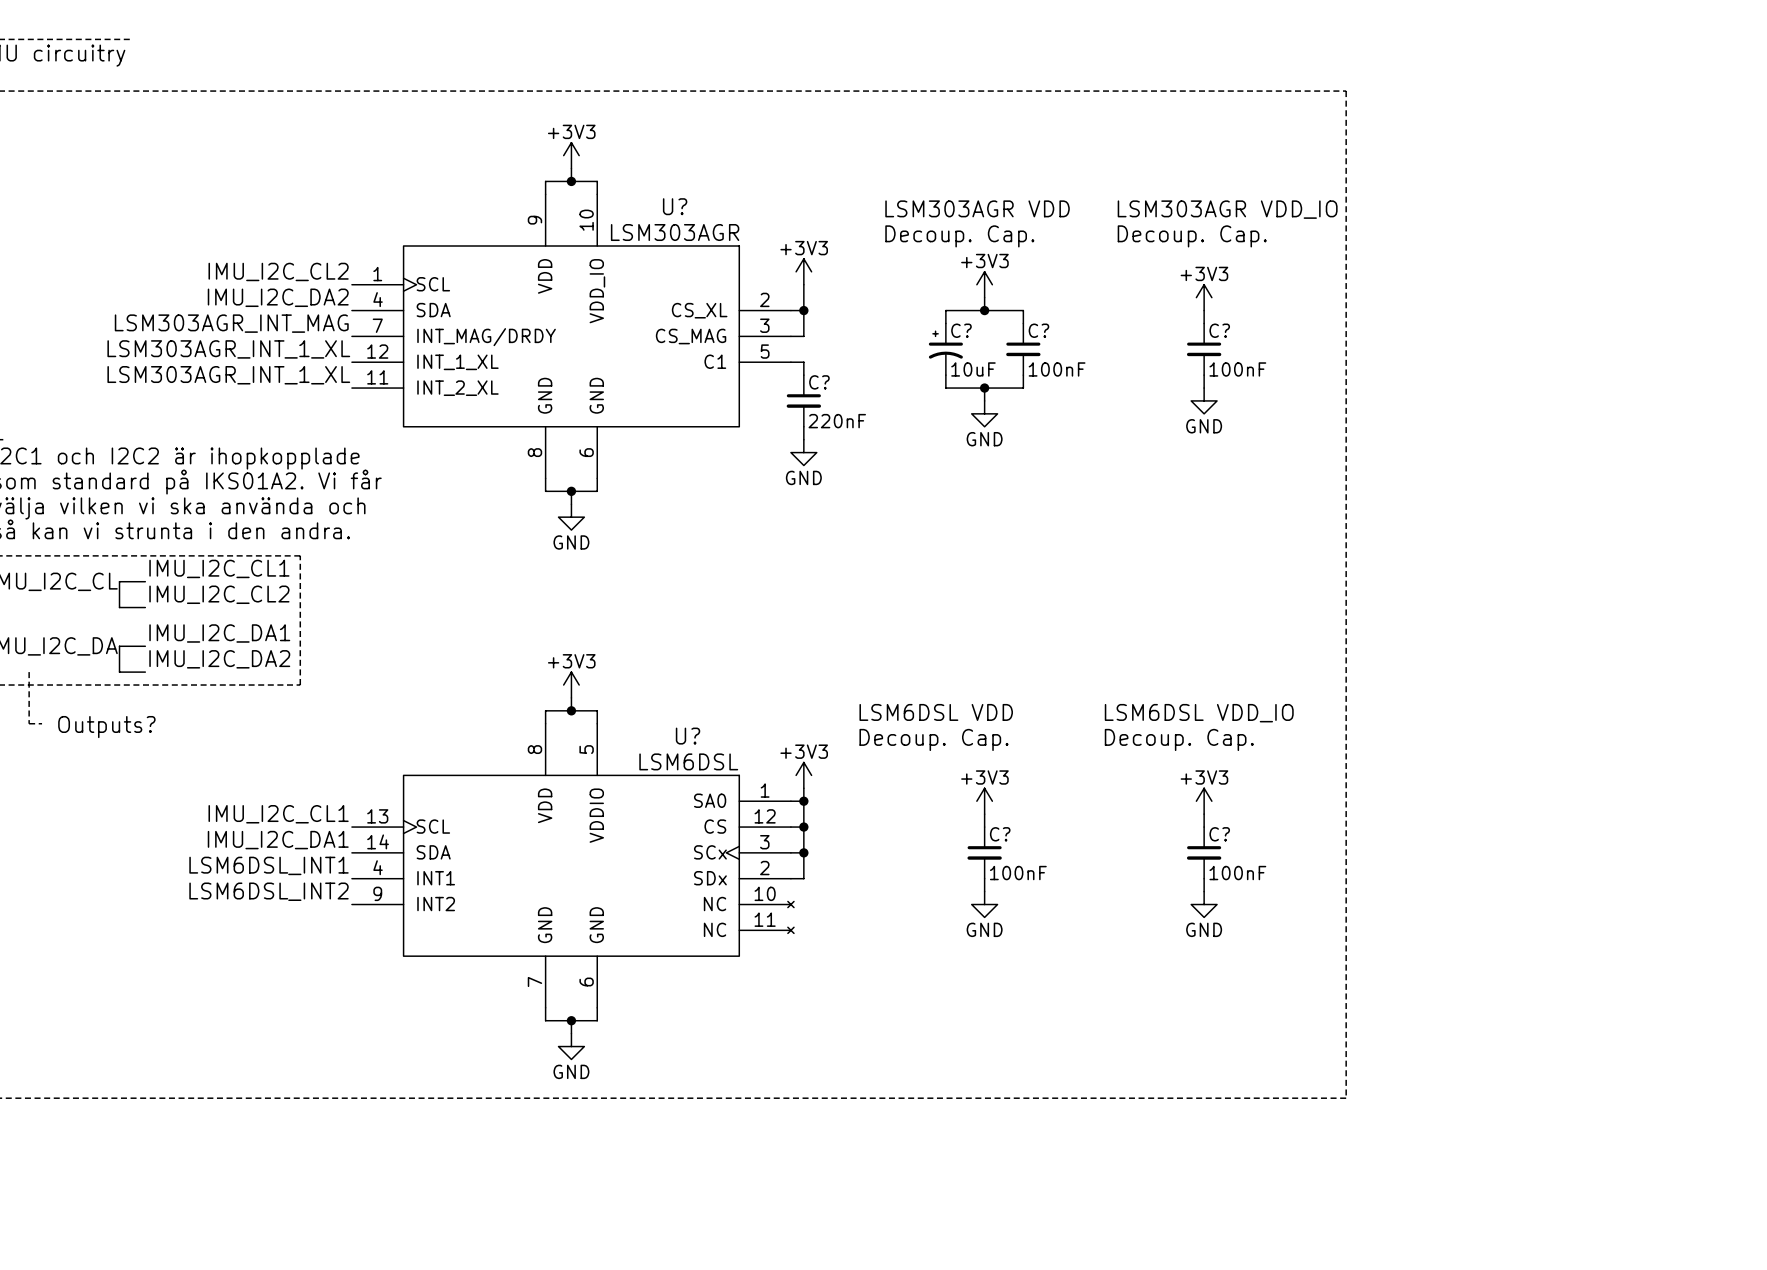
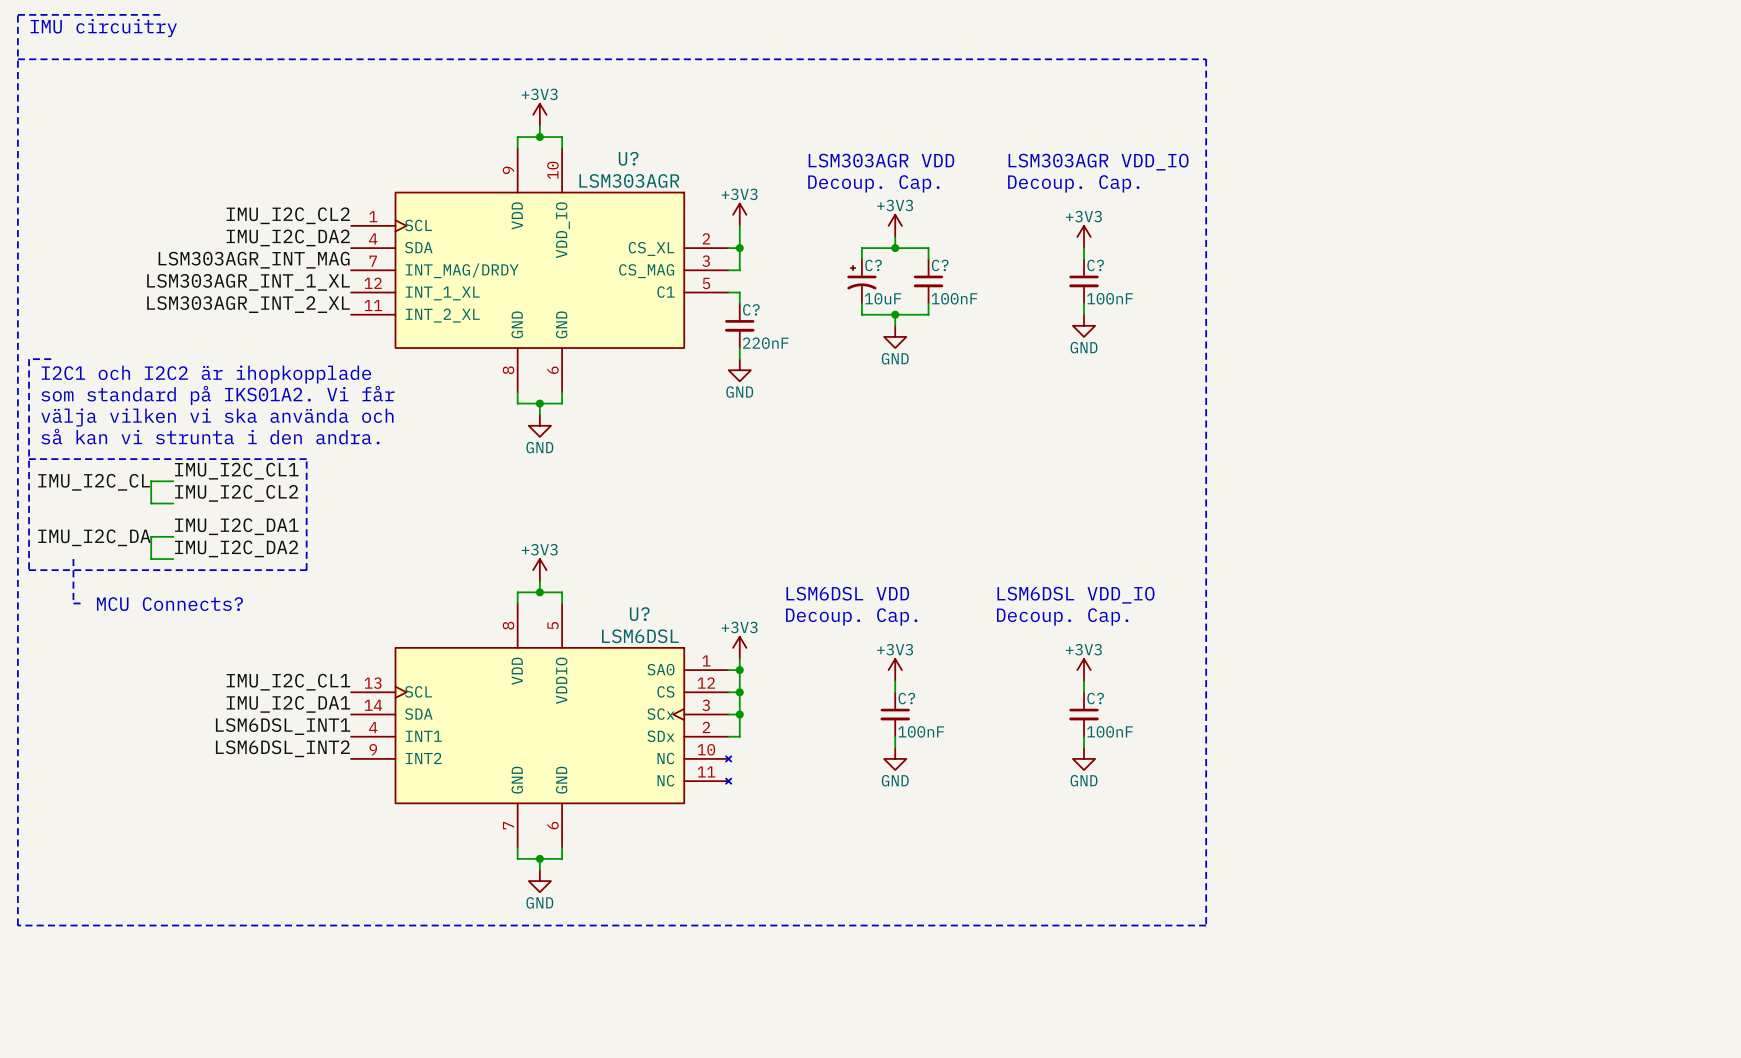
label: LSM303AGR_INT_1_XL (228, 375) -> LSM303AGR_INT_2_XL (248, 304)
text: Outputs? (106, 727) -> MCU Connects? (169, 604)

